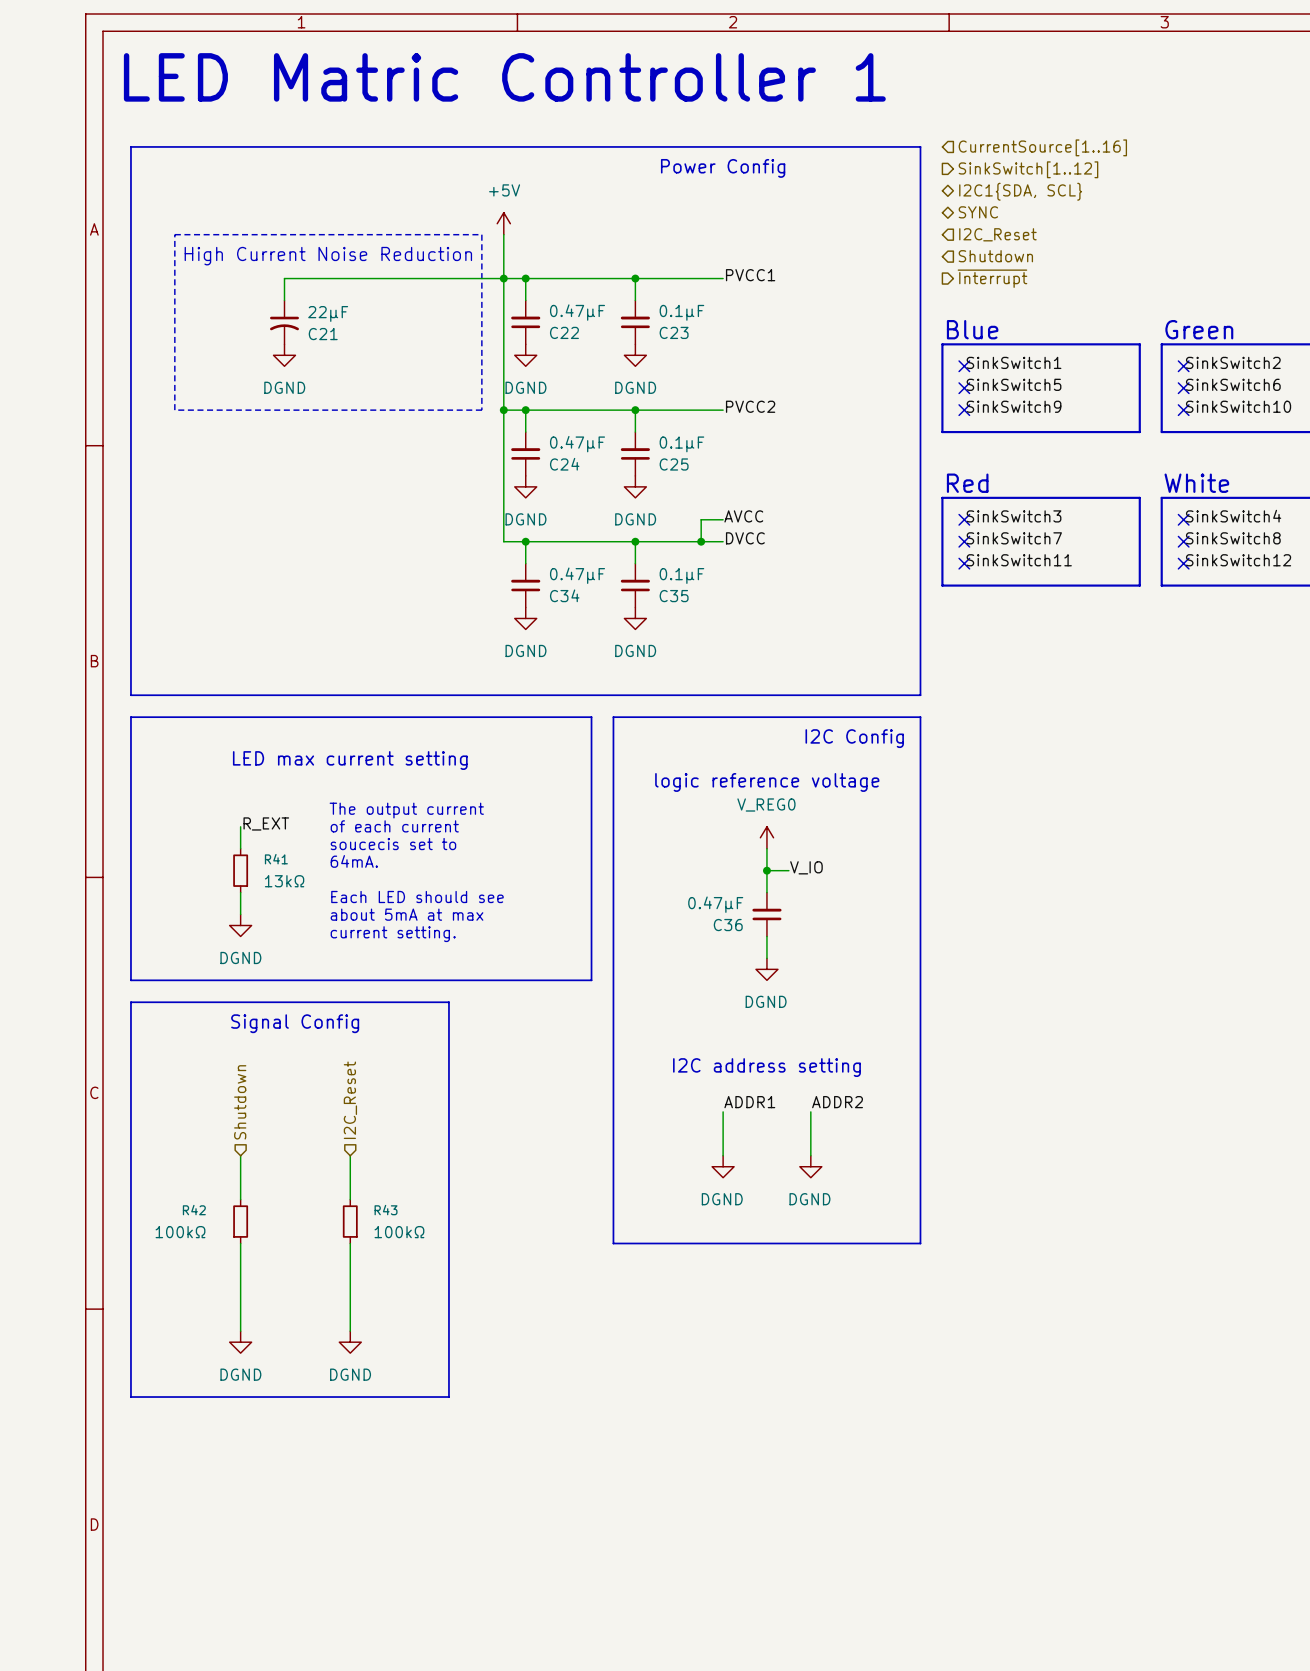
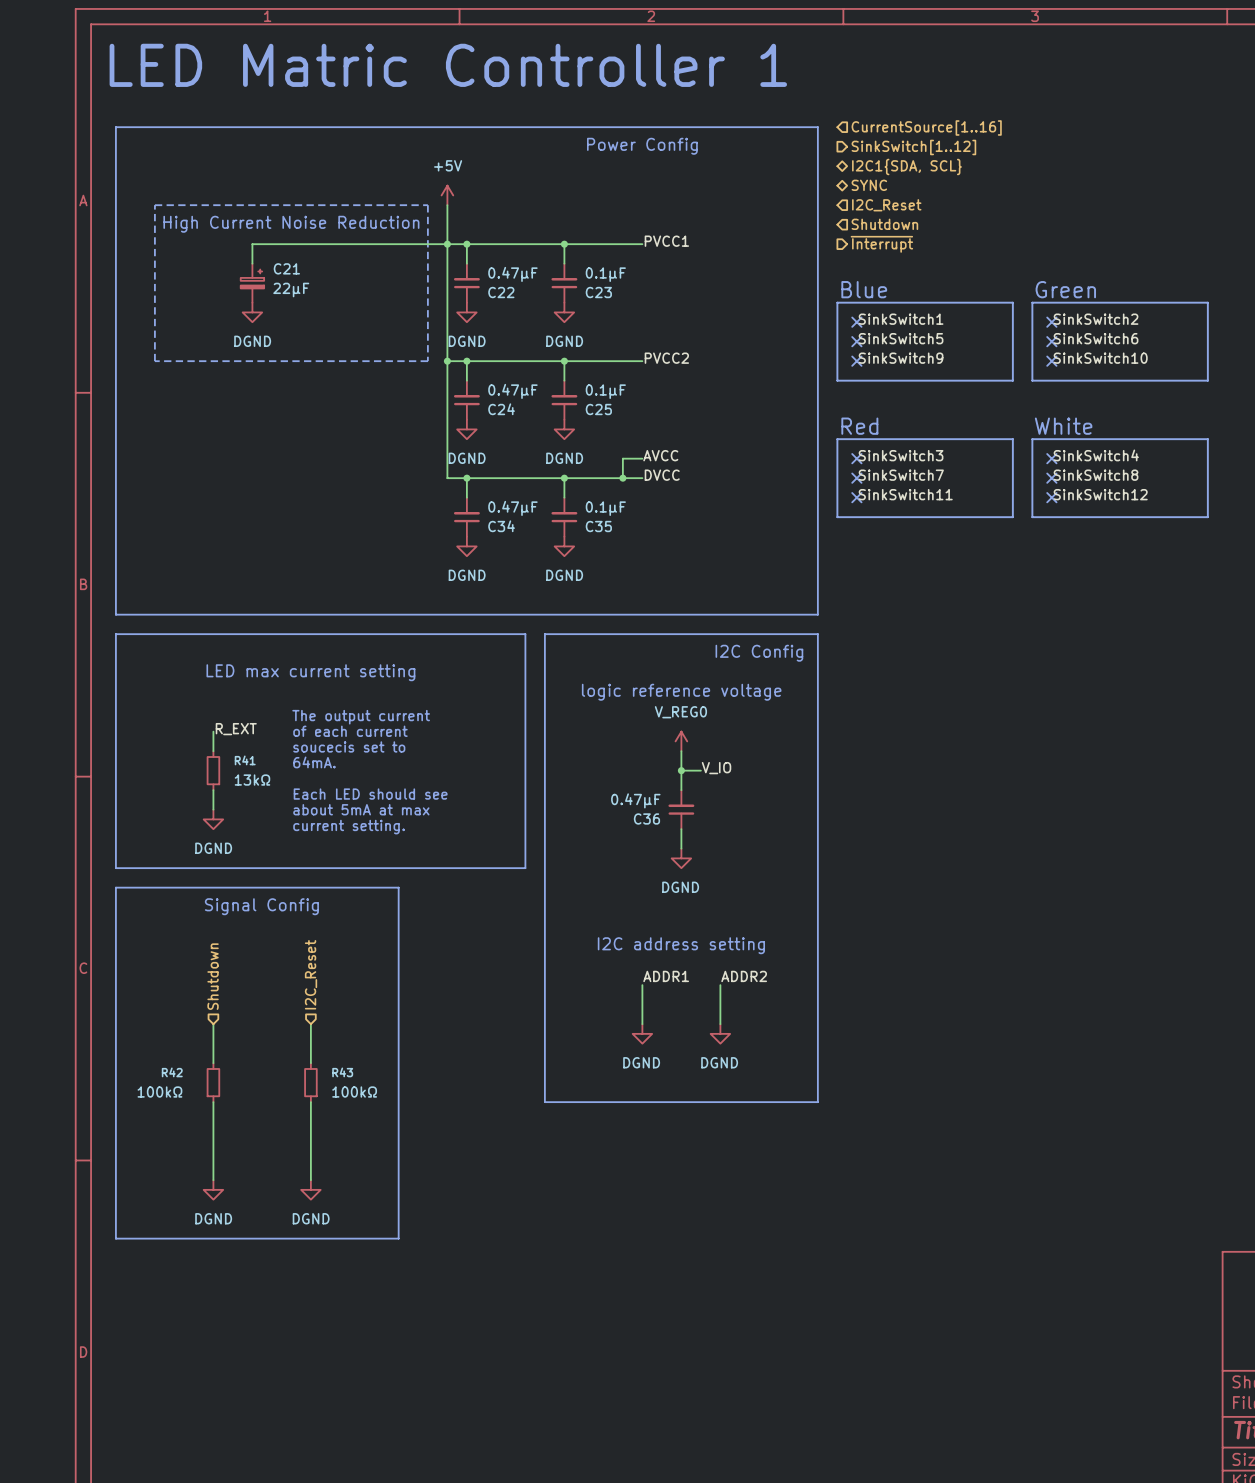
C21 symbol: [270, 300, 299, 345] -> [240, 263, 265, 303]
C21 name position: C21 (323, 334) -> C21 (286, 268)

